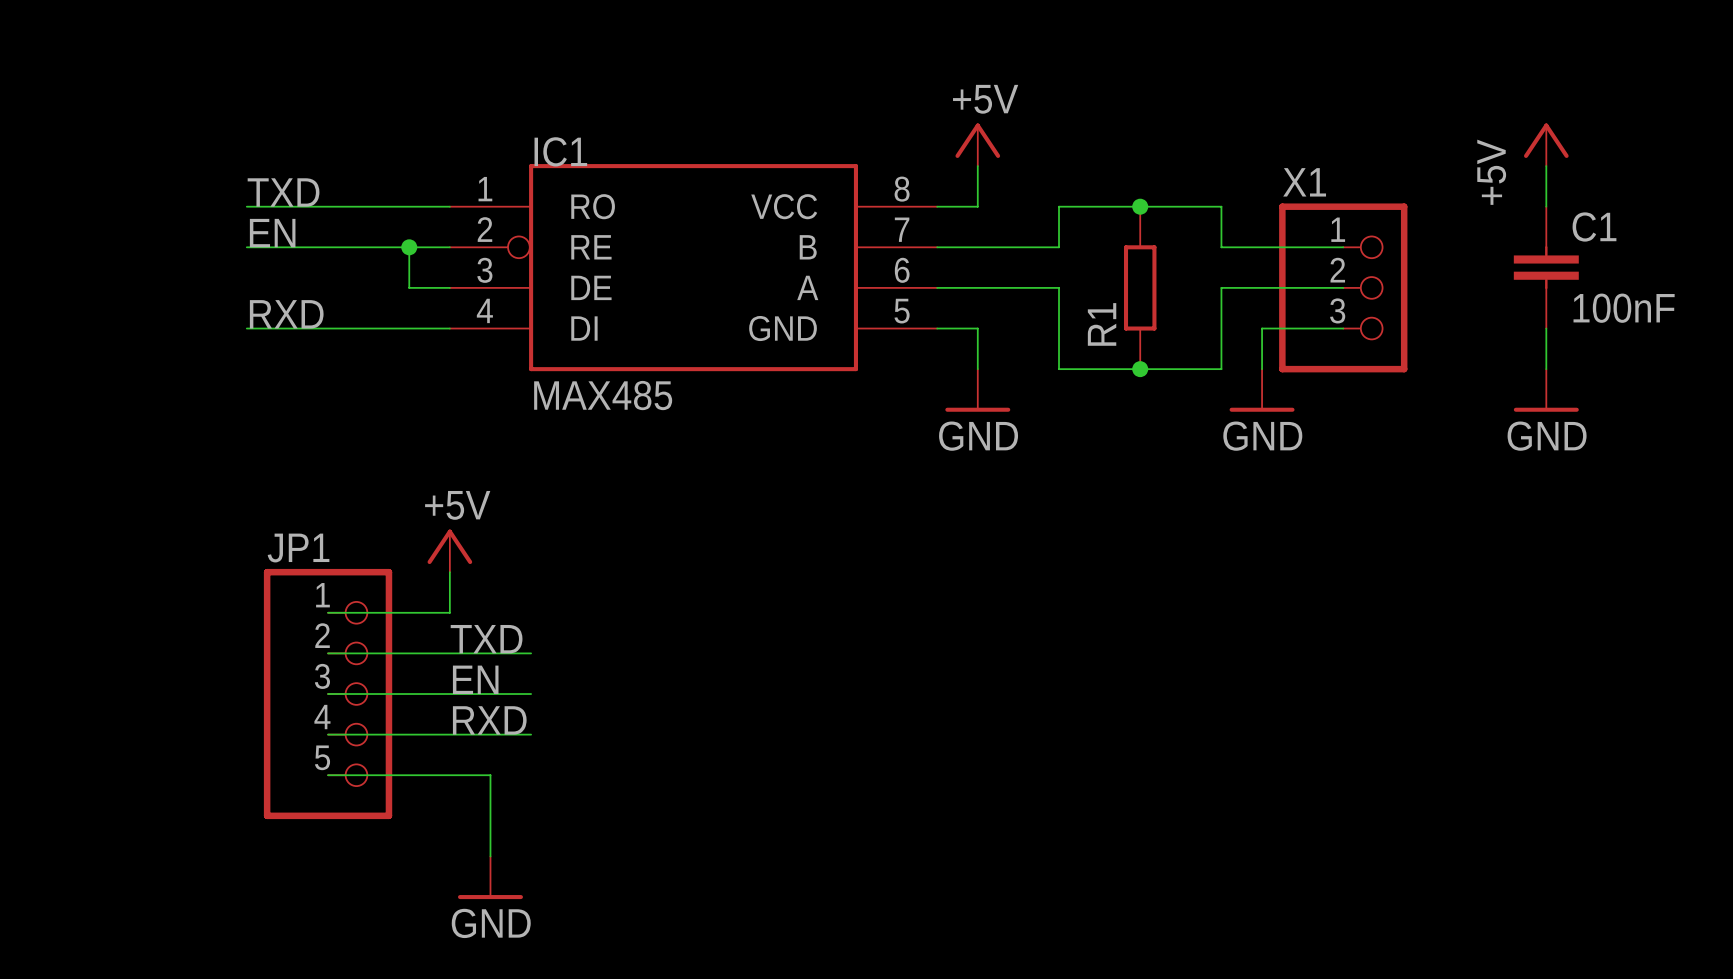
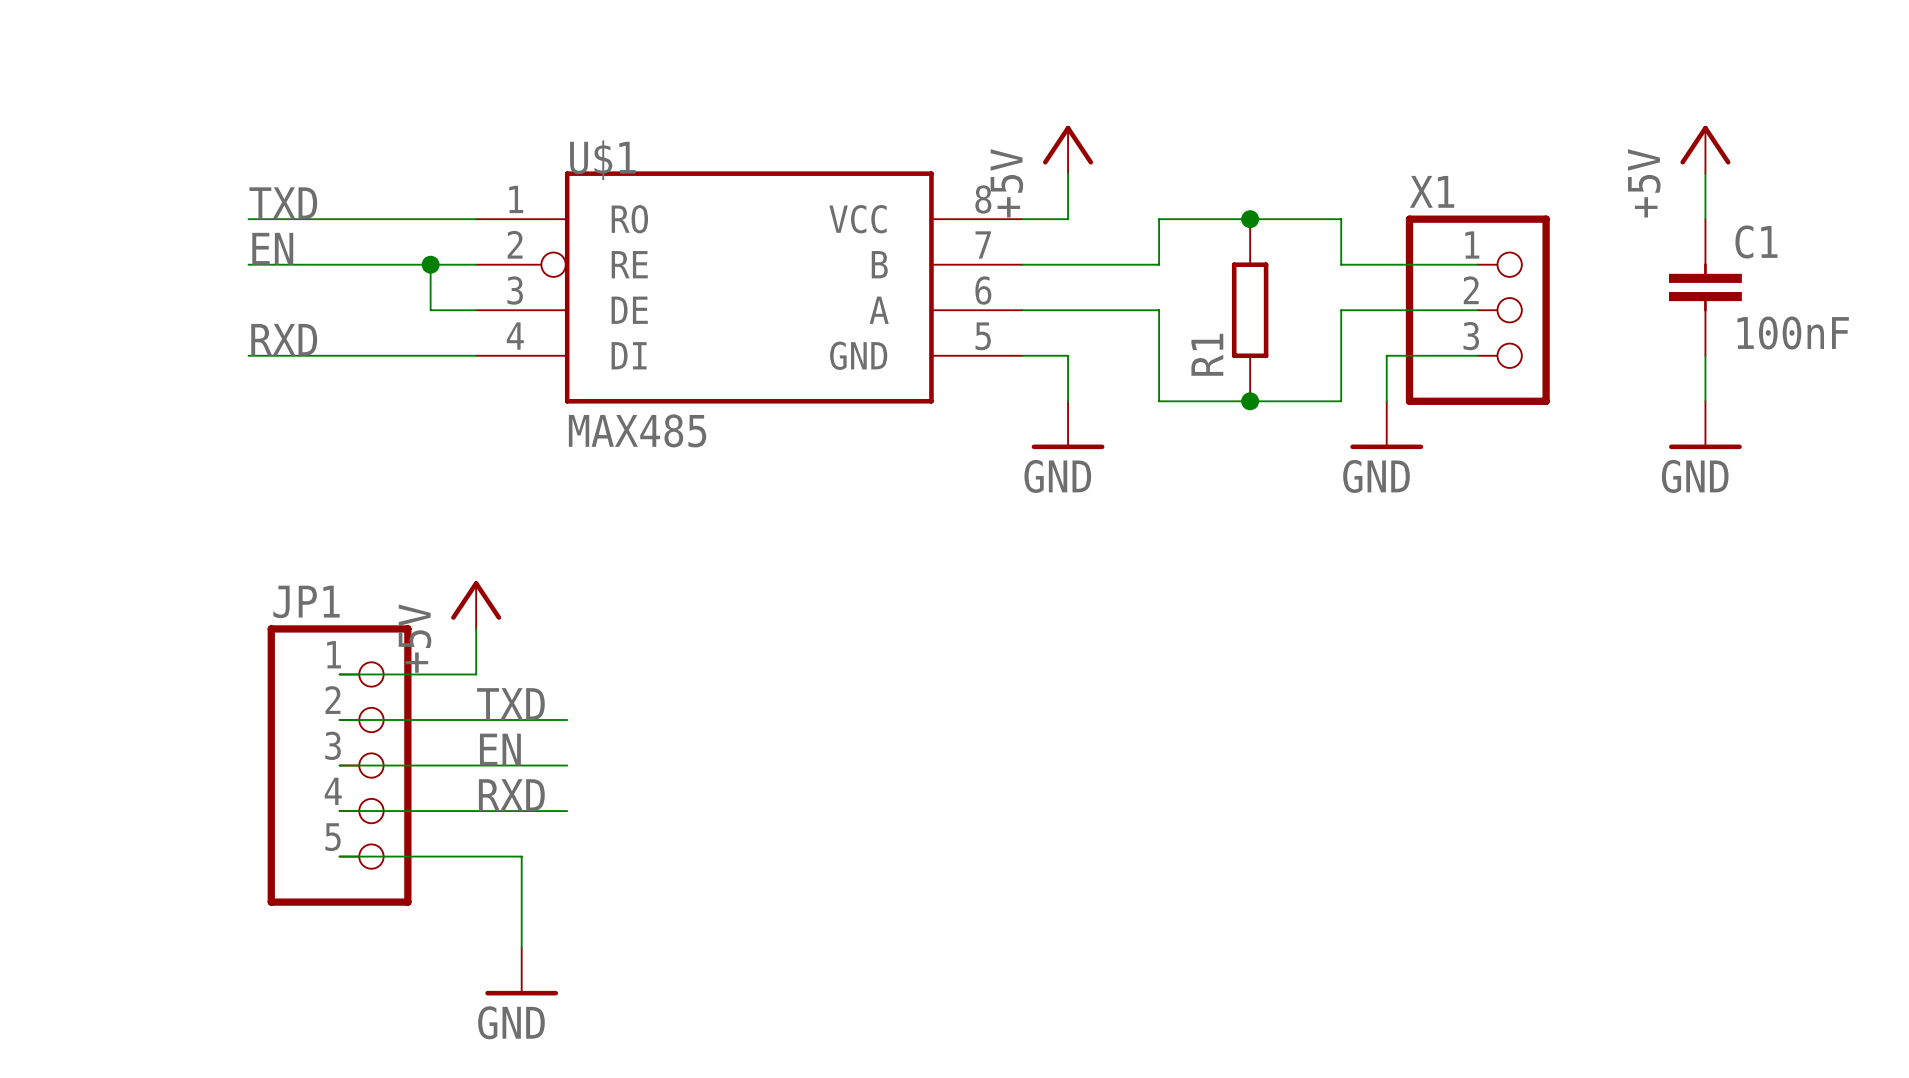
power symbol text rotation: 0° (985, 99) -> 90° counterclockwise (1006, 183)
IC1 name: IC1 (560, 151) -> U$1 (602, 160)
power symbol text rotation: 0° (457, 505) -> 90° counterclockwise (415, 638)

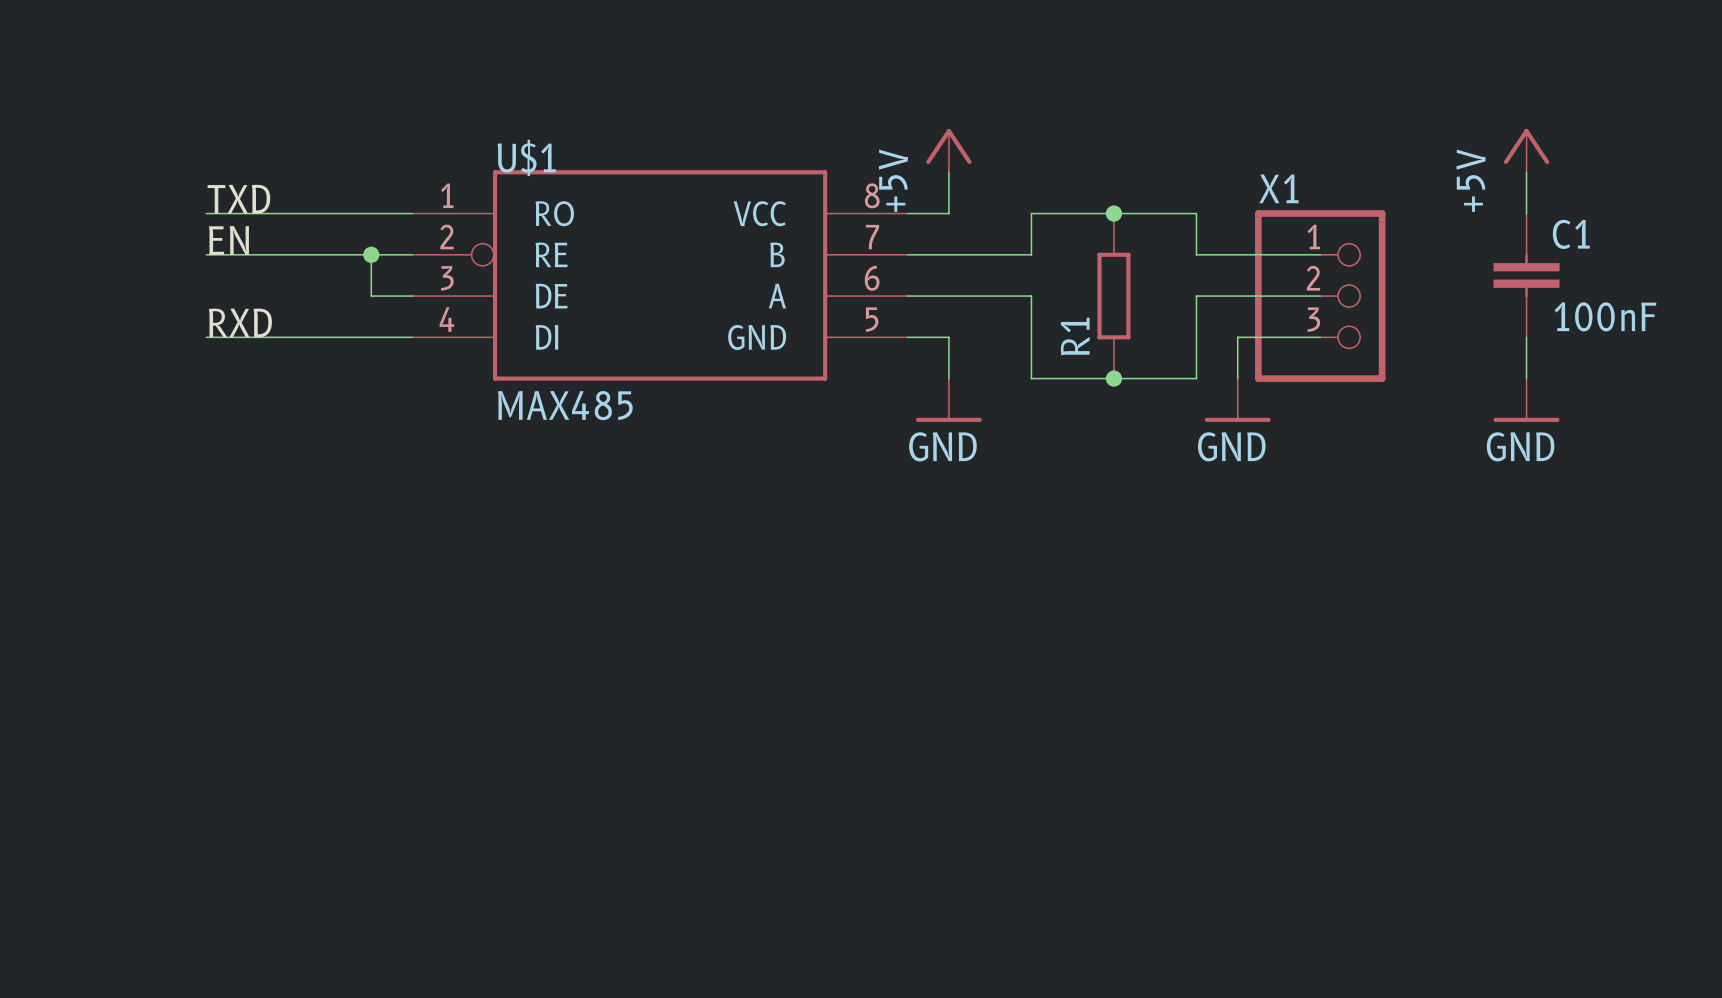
power symbol: +5V (476, 605) -> none
wire: (476, 628) (476, 674) (339, 674) -> none
label: TXD (510, 704) -> none
wire: (339, 719) (567, 719) -> none
label: EN (500, 749) -> none
wire: (339, 765) (567, 765) -> none
JP1: (339, 765) -> none
label: RXD (511, 795) -> none
wire: (339, 811) (567, 811) -> none
wire: (339, 856) (521, 856) (521, 947) -> none
power symbol: GND (521, 971) -> none

